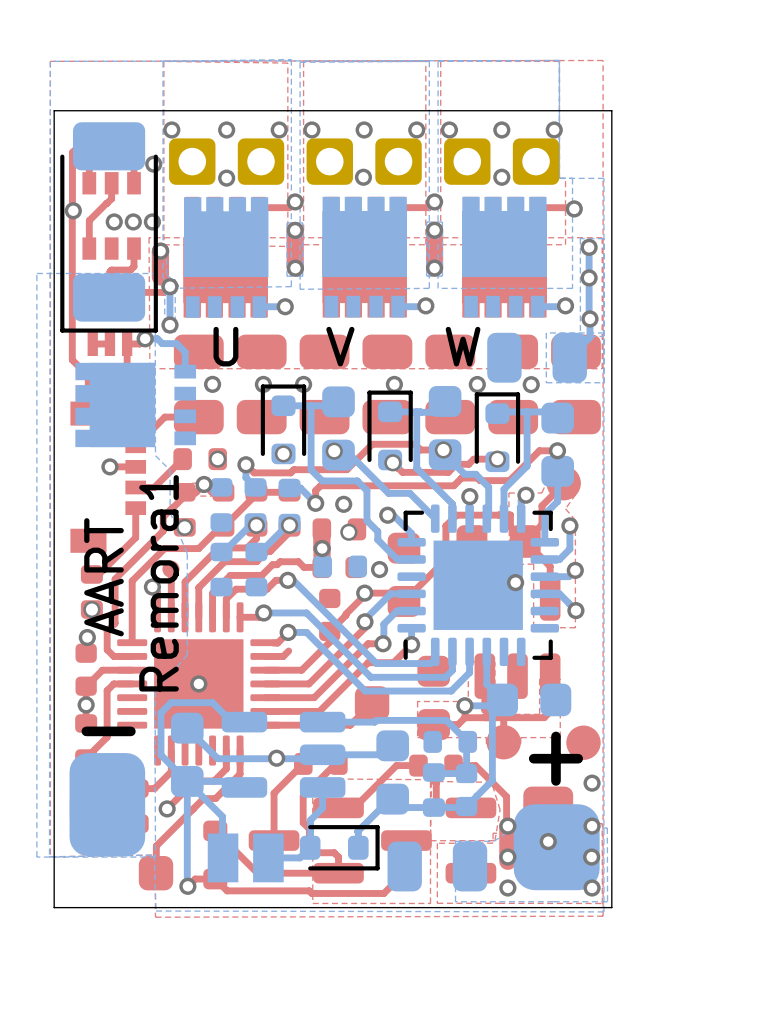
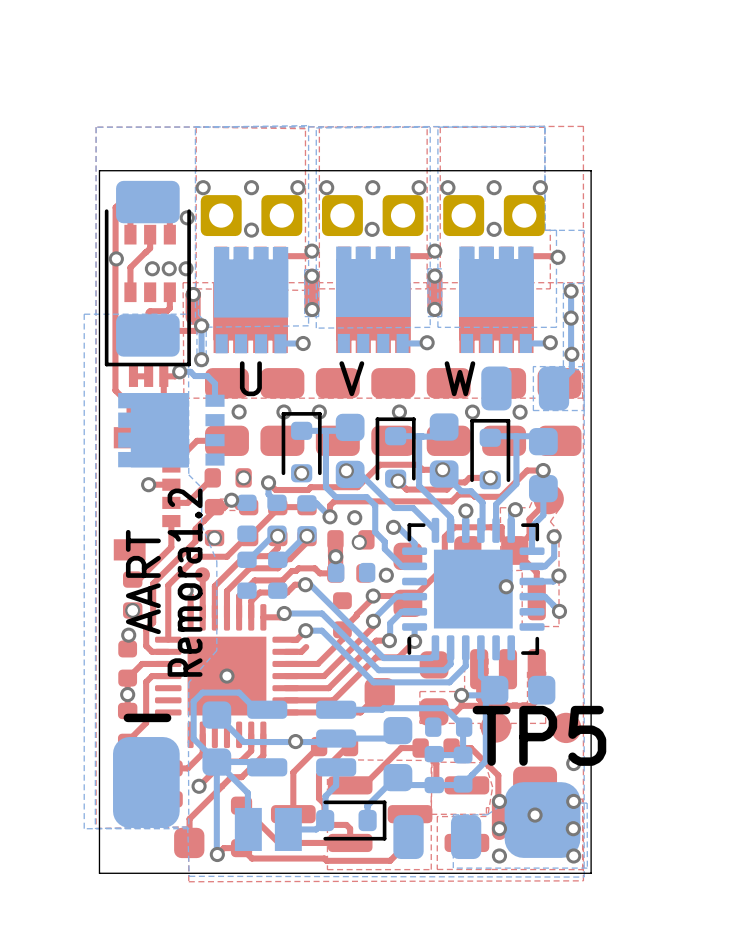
text: Remora1 (159, 583) -> Remora1.2 (185, 582)
TP5 name: + (555, 758) -> TP5 (539, 735)

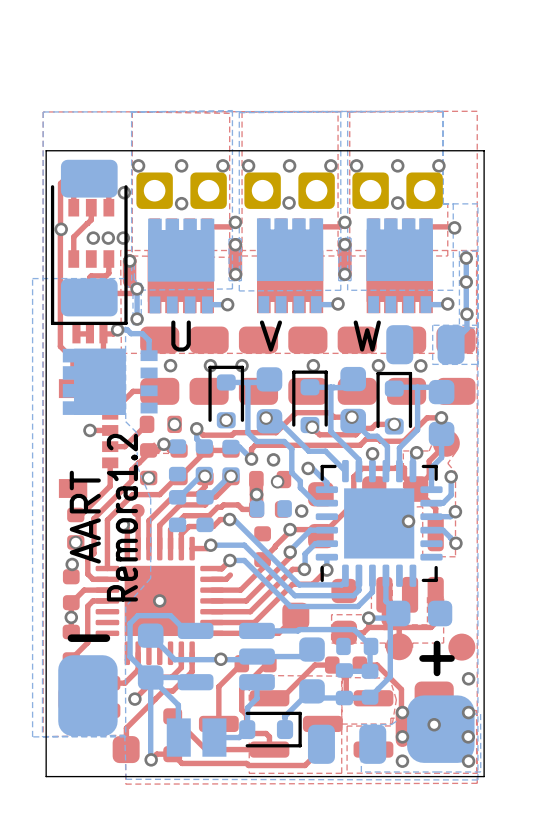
TP5 name: TP5 (539, 735) -> none
text: none -> + (437, 658)

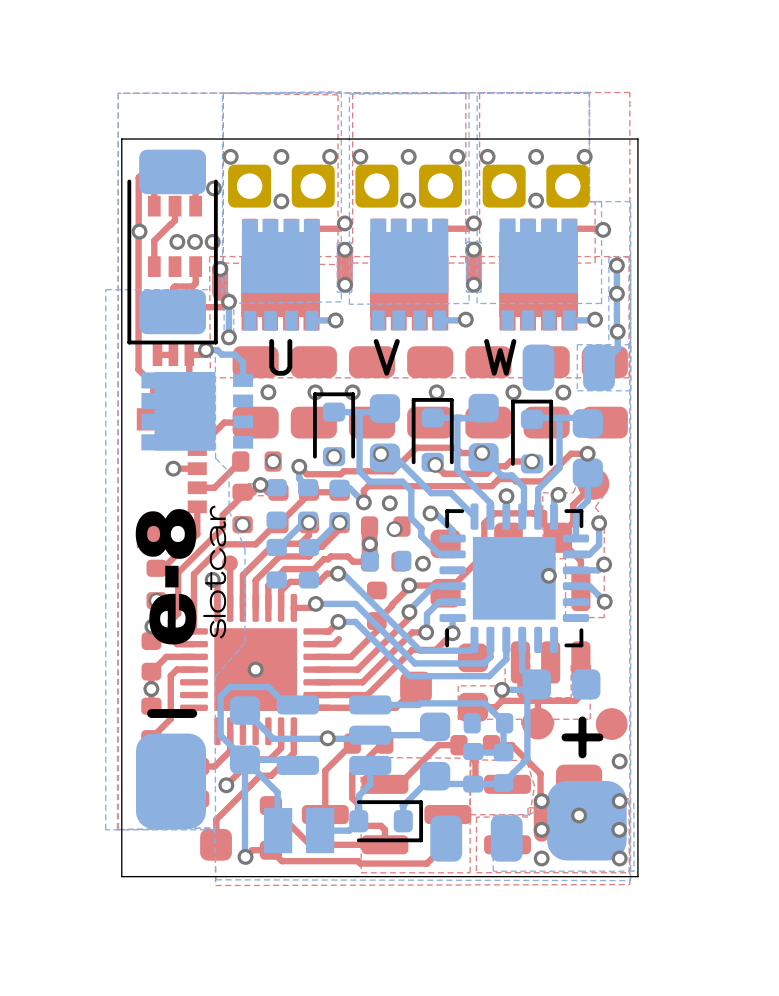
drawing: none -> [135, 505, 227, 645]
text: AART (85, 517) -> none
text: Remora1.2 (122, 517) -> none

